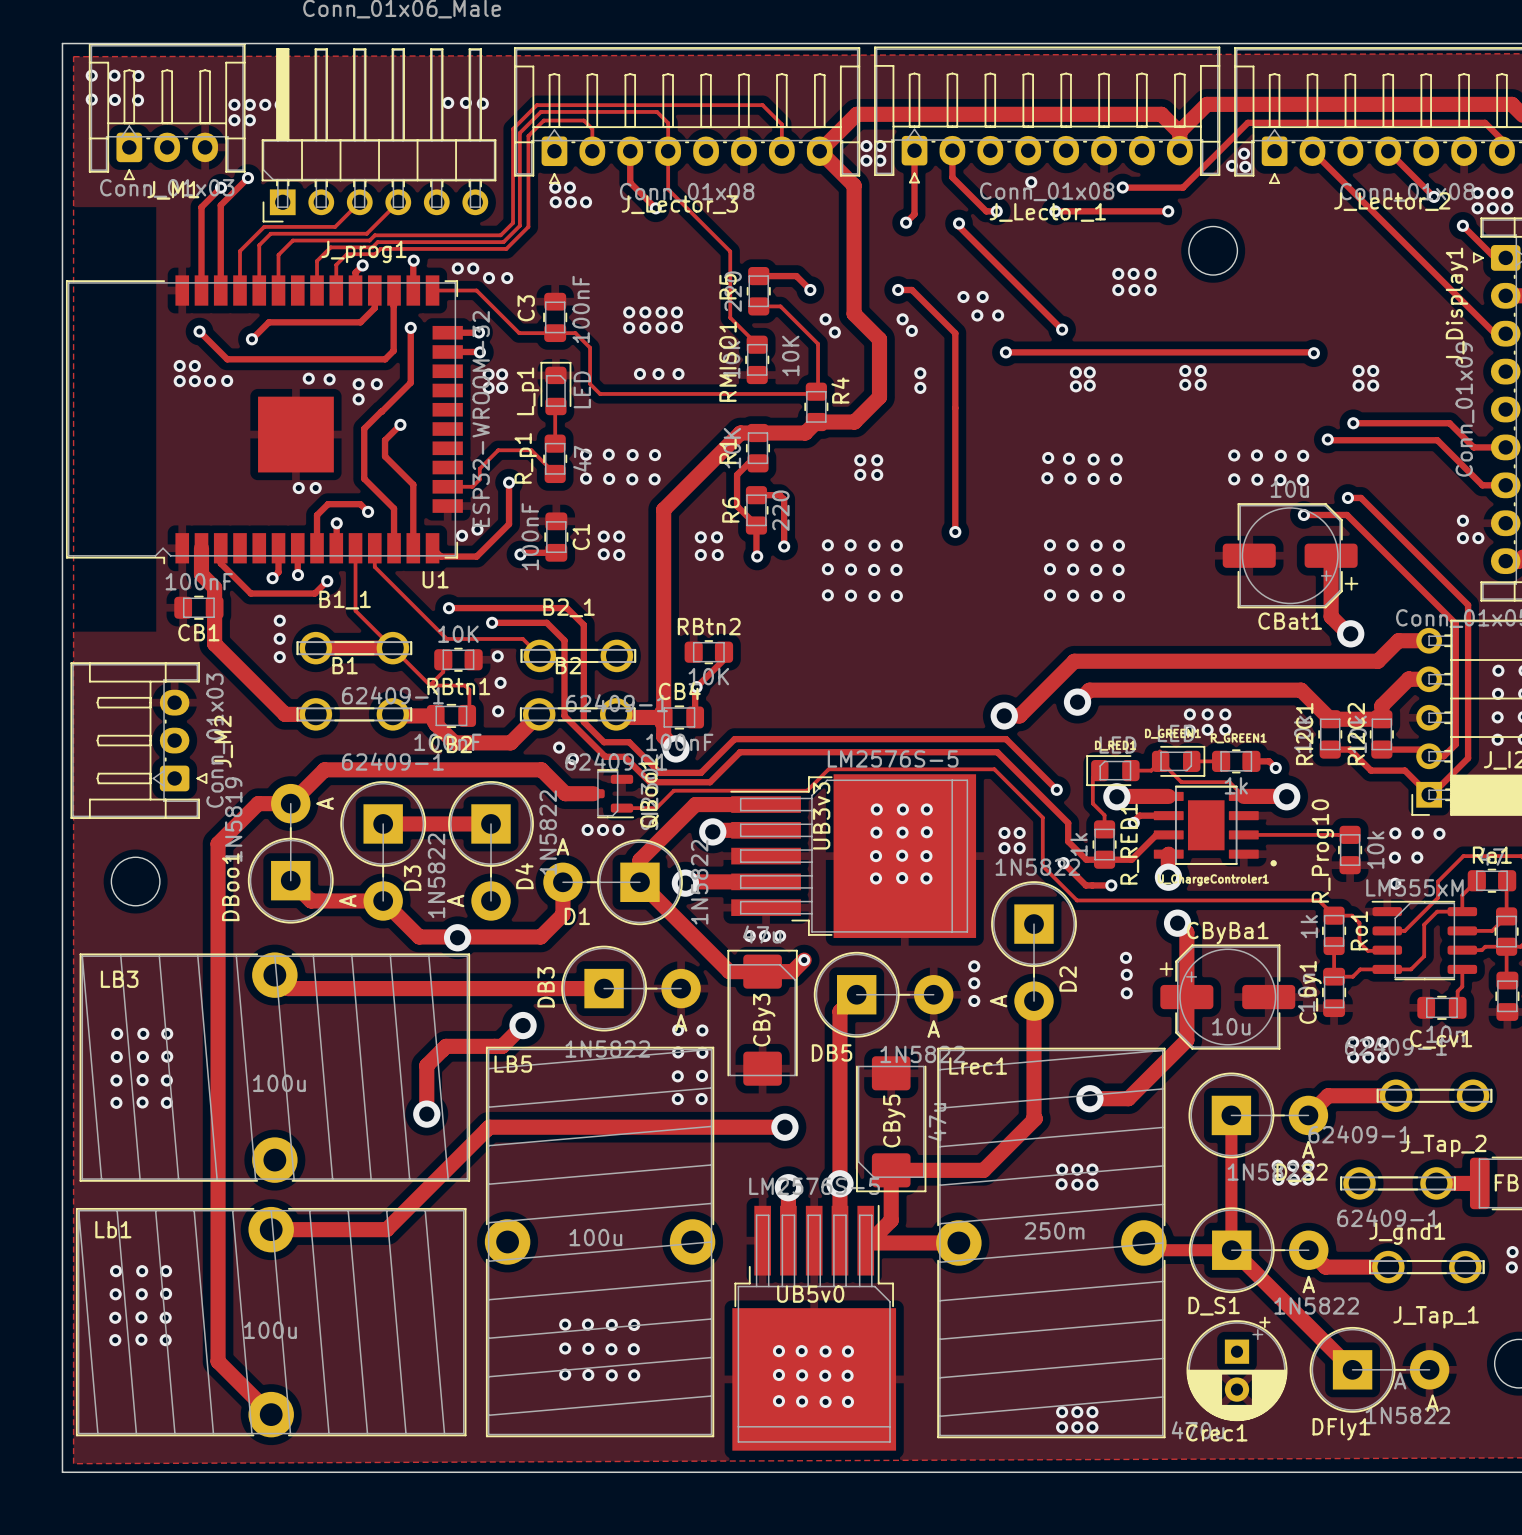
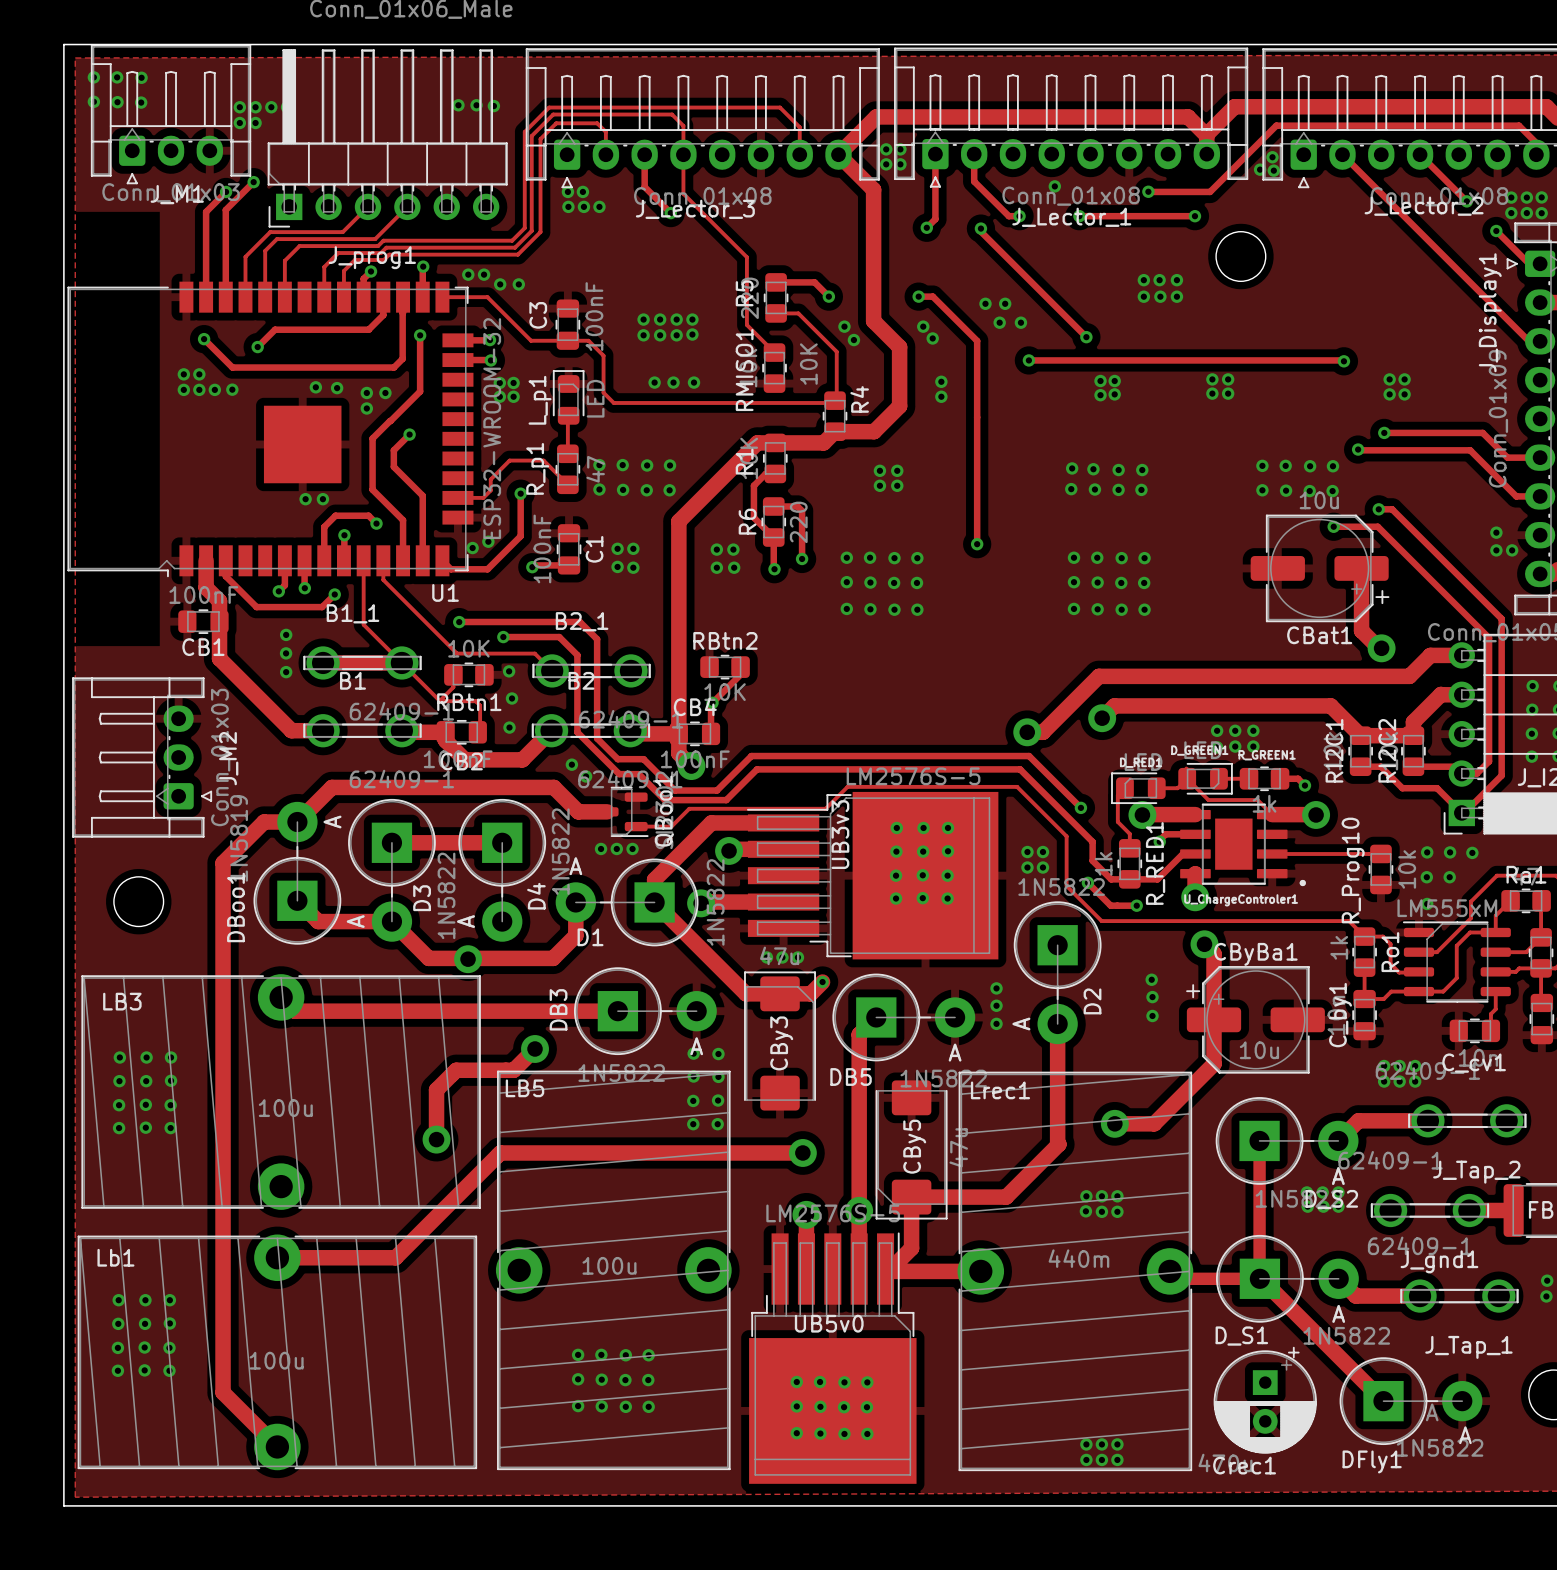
Lrec1 value: 250m (1054, 1230) -> 440m (1078, 1258)

